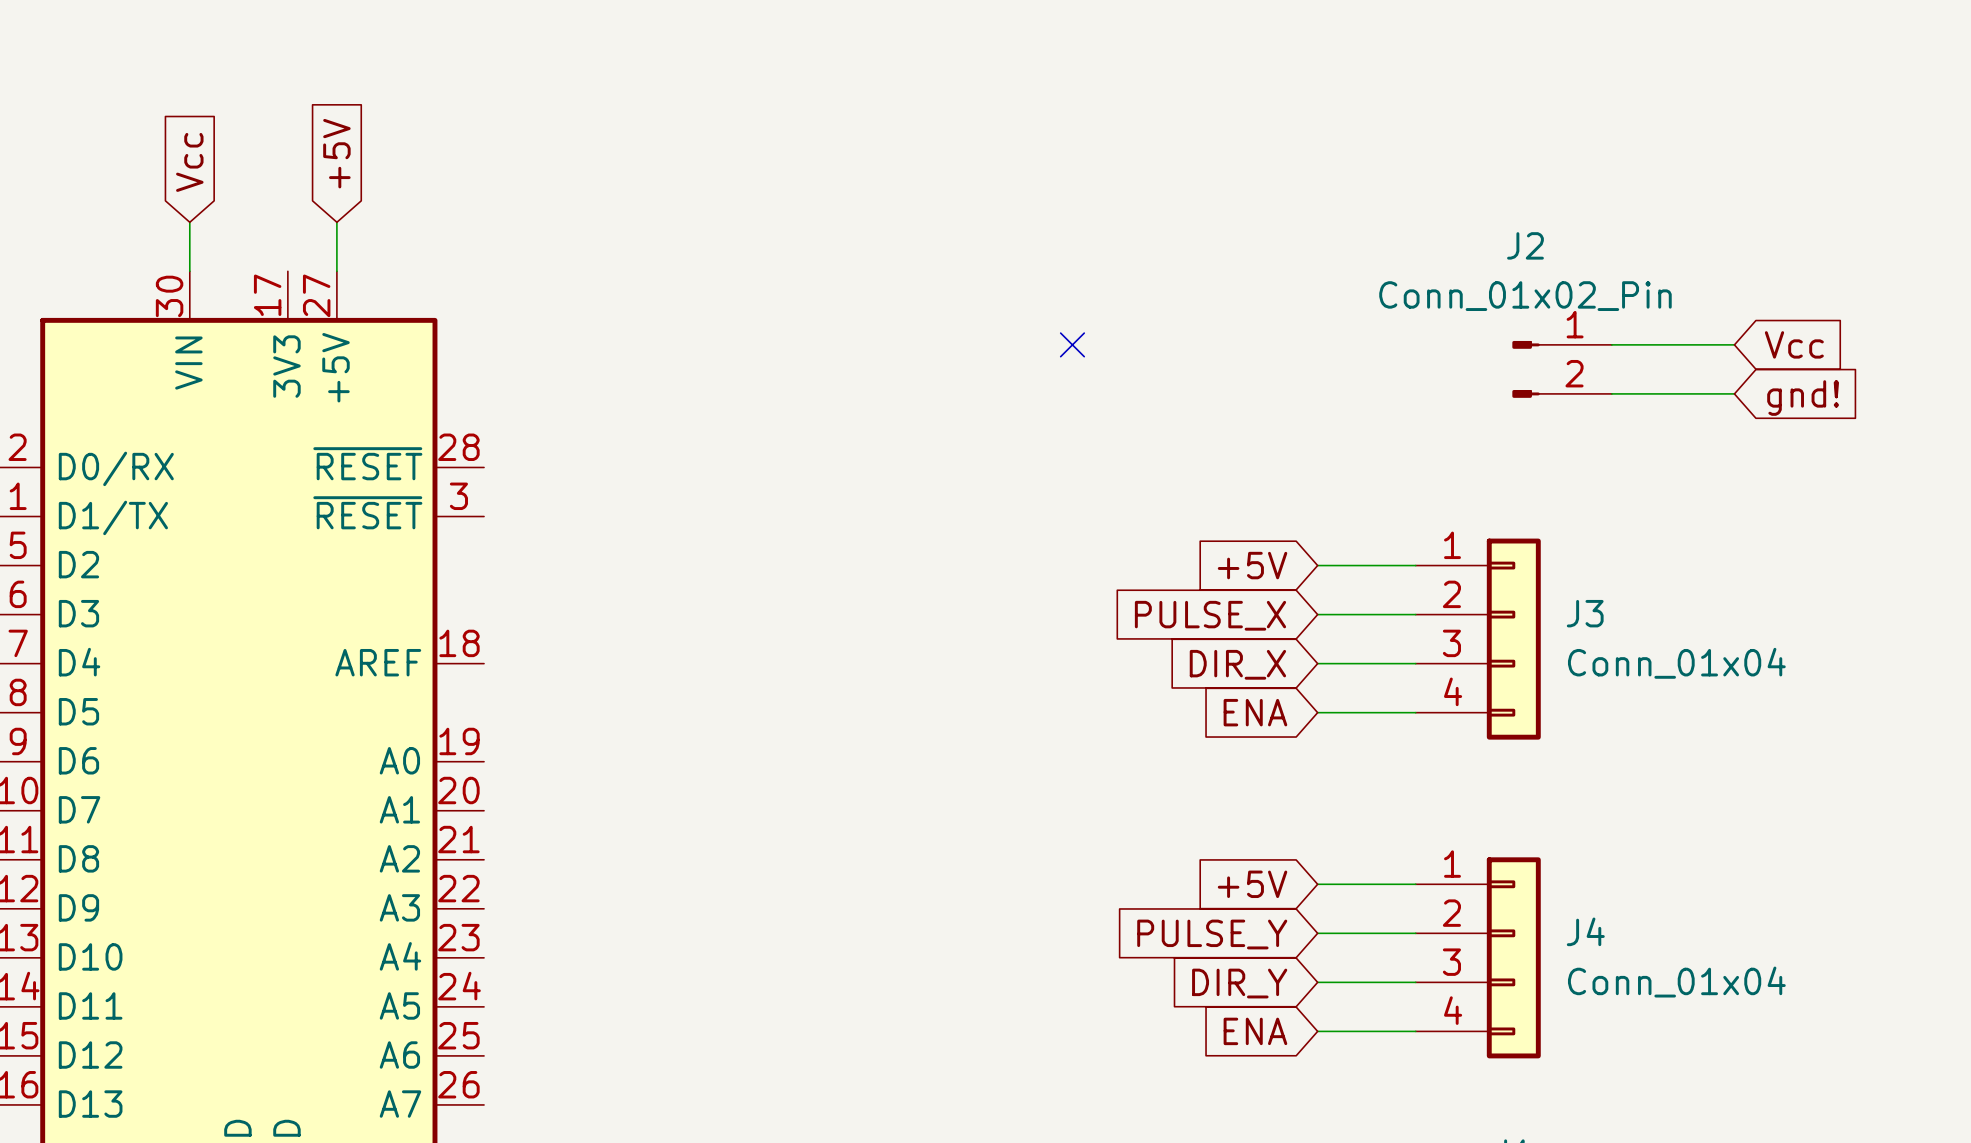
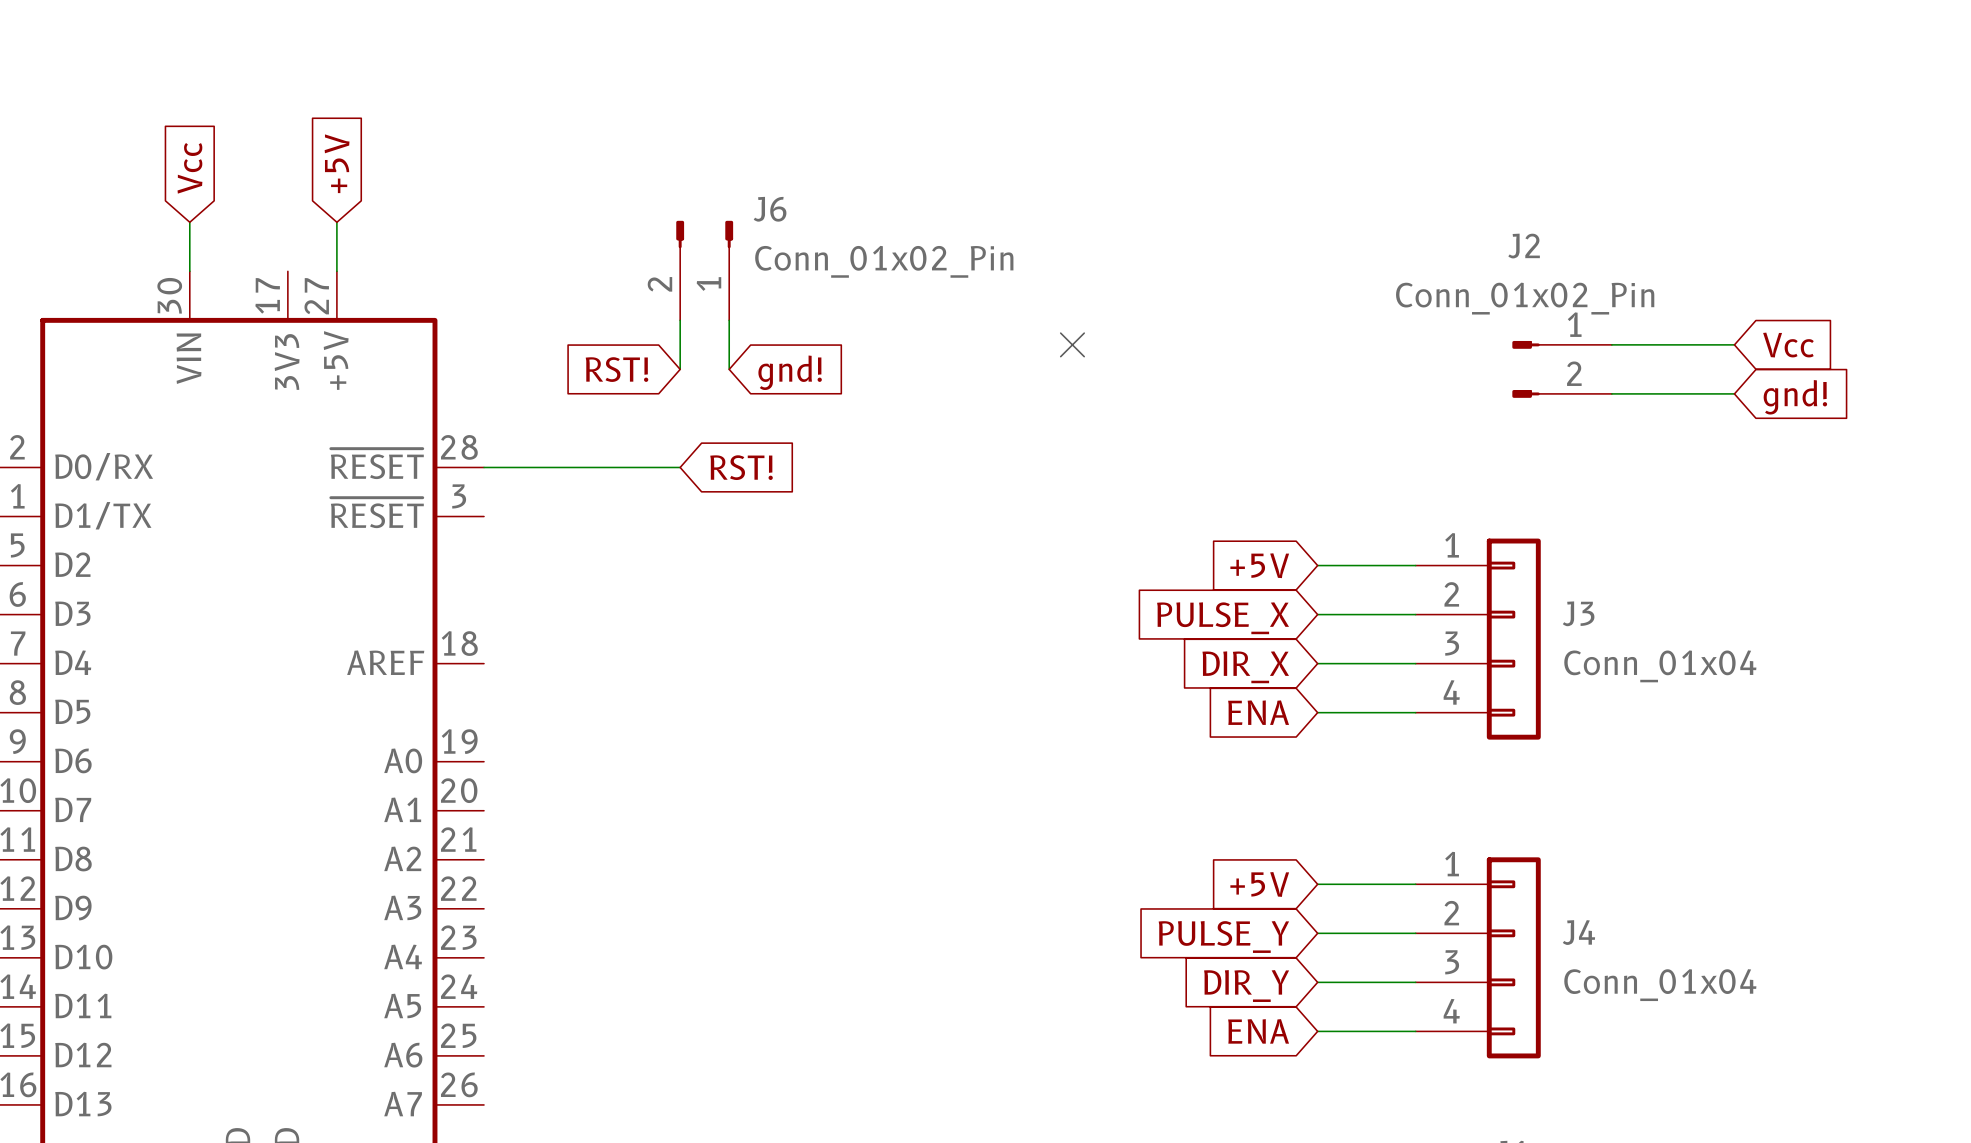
J6: none -> Conn_01x02_Pin (704, 270)
wire: none -> (680, 320) (680, 369)
wire: none -> (729, 320) (729, 369)
global label: none -> RST! (616, 369)
global label: none -> gnd! (790, 372)
wire: none -> (484, 467) (680, 467)
global label: none -> RST! (741, 467)

